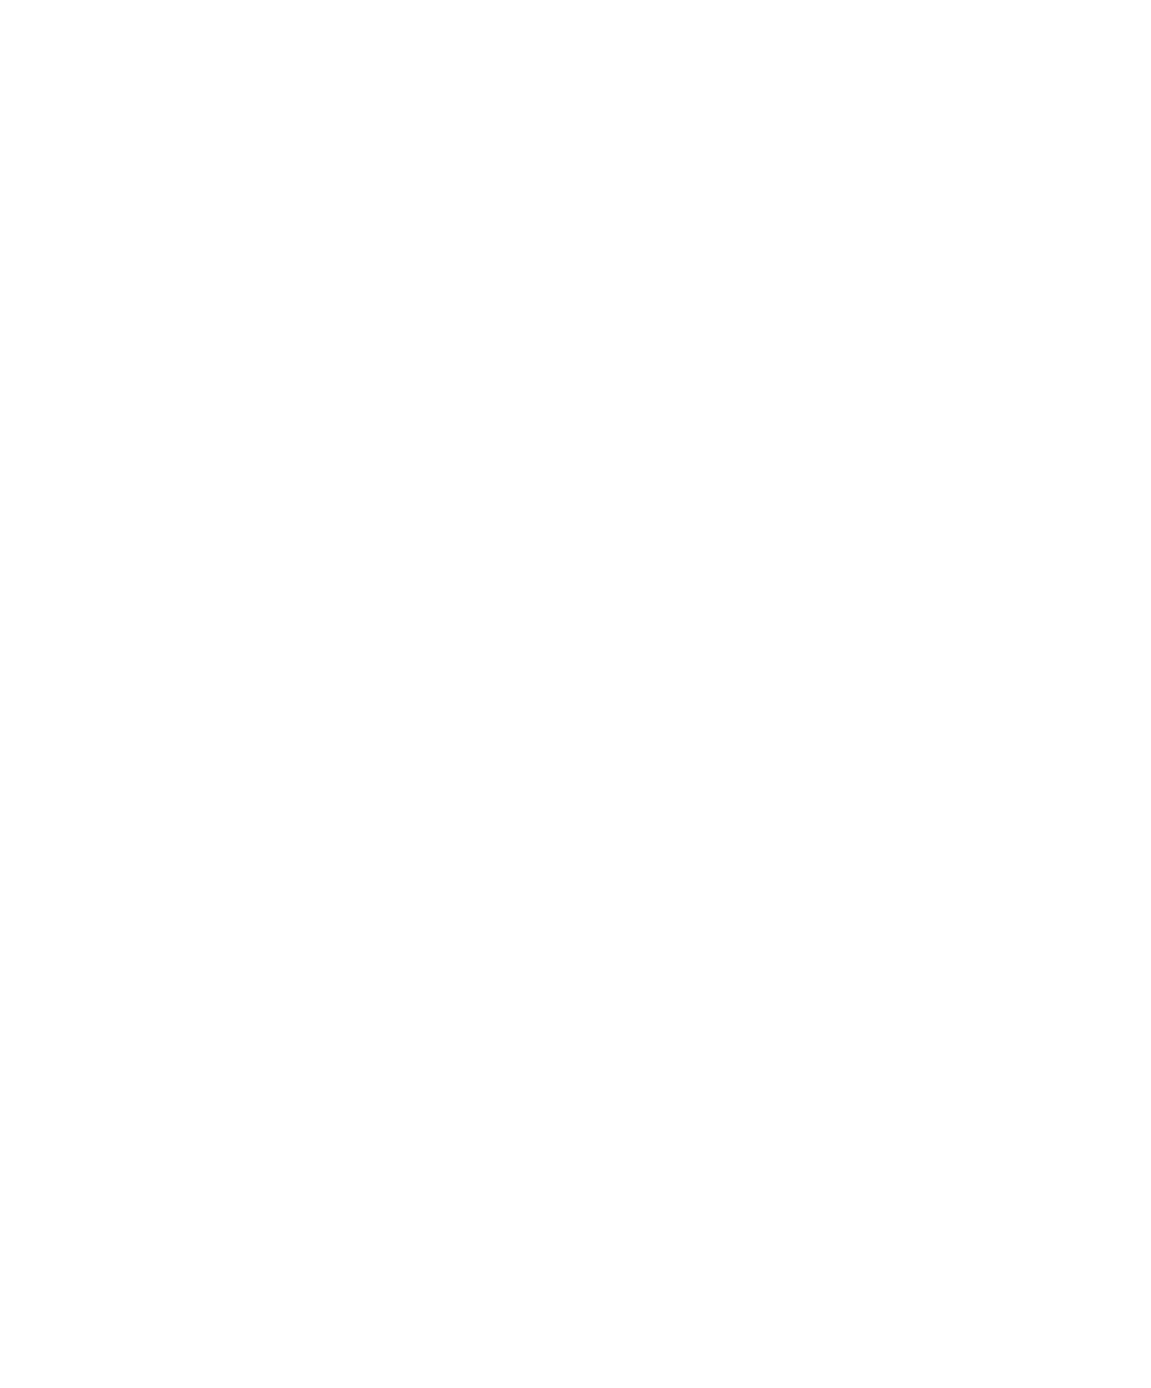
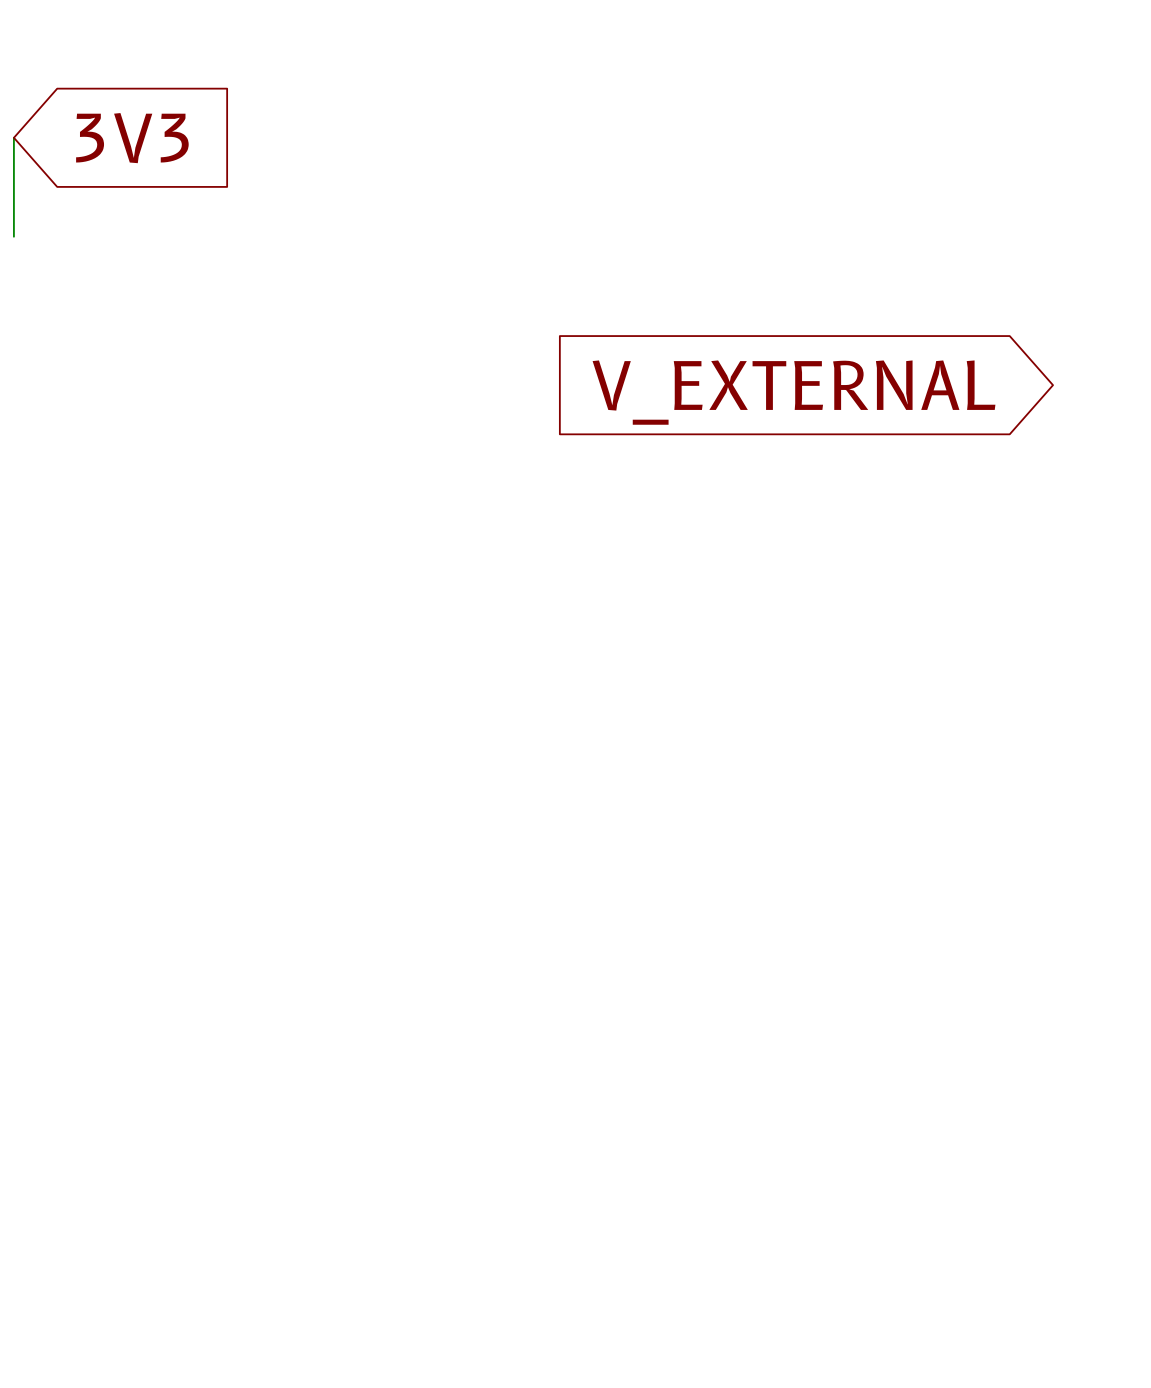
wire: none -> (13, 137) (13, 236)
global label: none -> 3V3 (132, 138)
global label: none -> V_EXTERNAL (794, 392)

